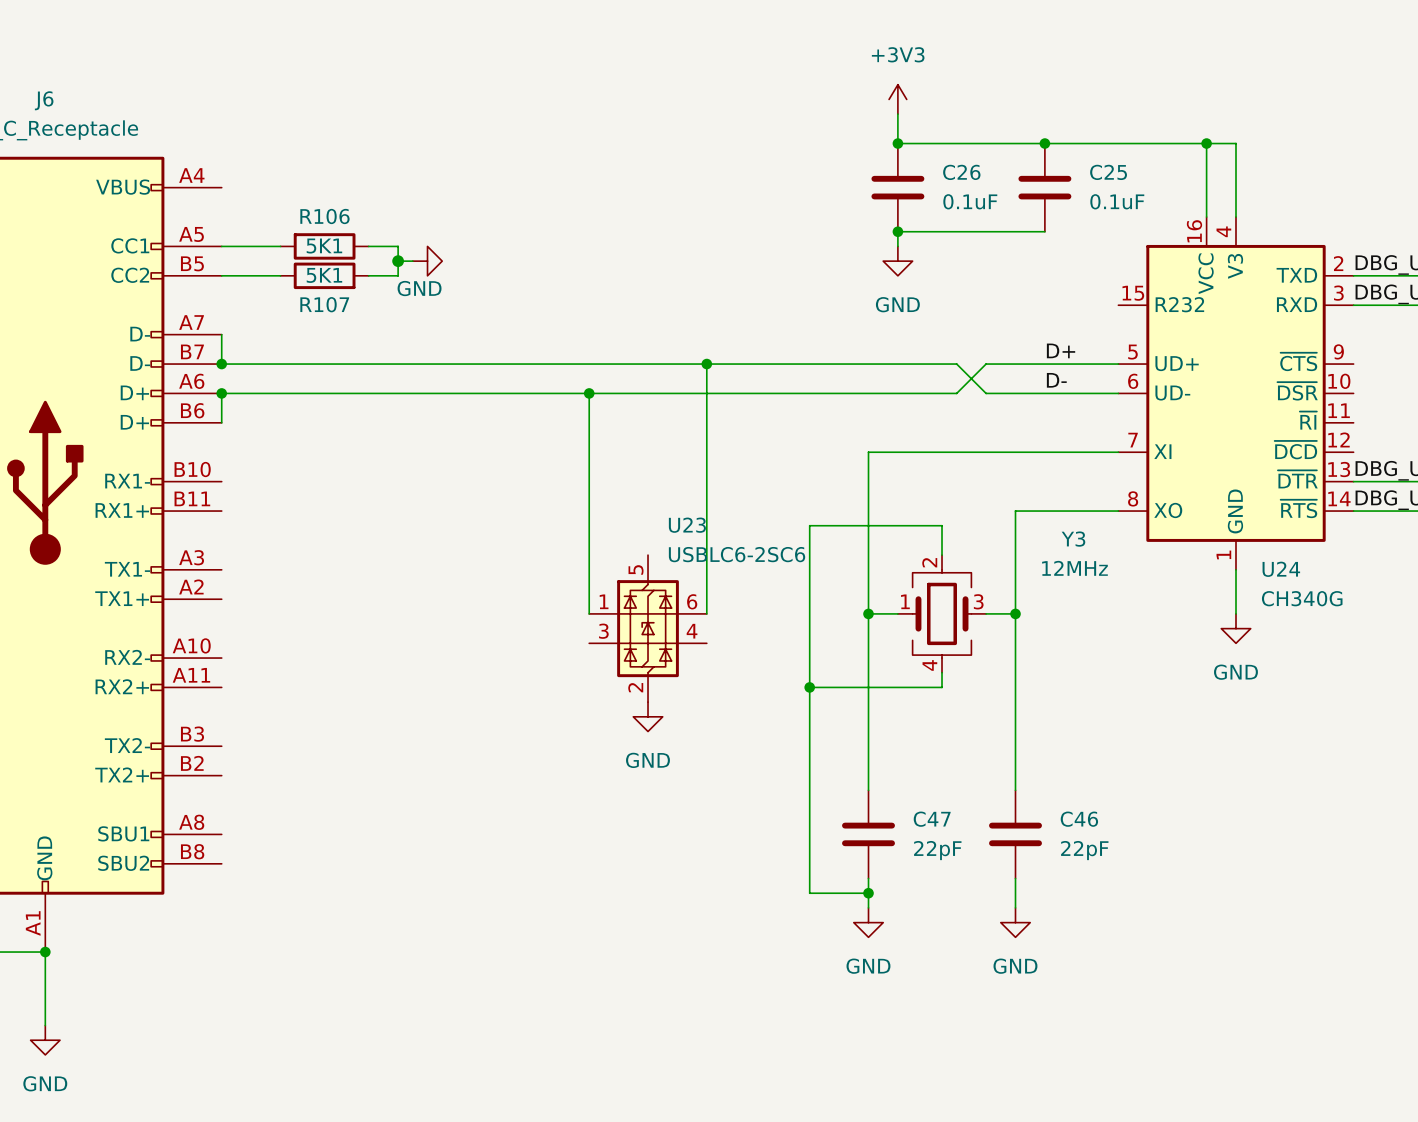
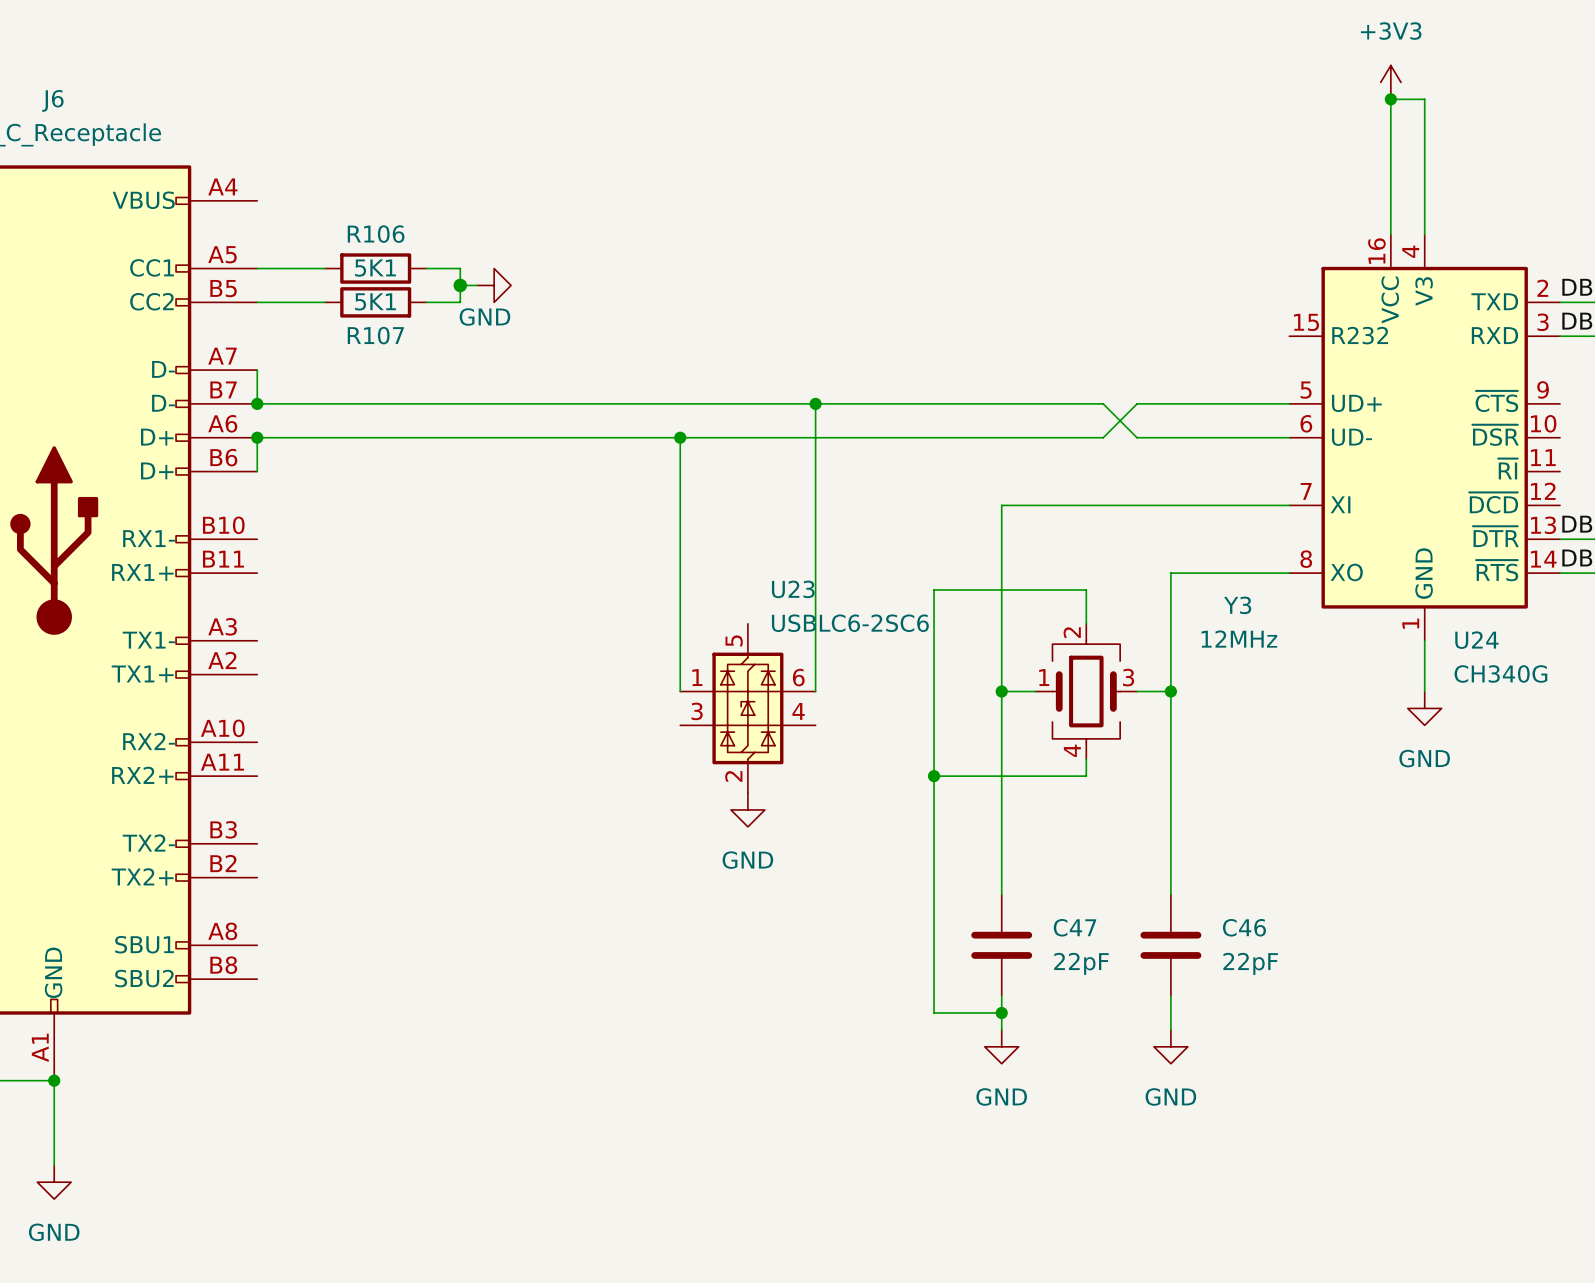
power symbol: none -> +3V3 (1390, 82)
power symbol: +3V3 (897, 99) -> none
wire: (897, 114) (897, 143) (1236, 143) -> (1390, 150) (1390, 99) (1424, 99) (1424, 150)
junction: (897, 143) -> none
junction: (1044, 143) -> none
junction position: (1206, 143) -> (1390, 99)
C26: 0.1uF (897, 187) -> none
C25: 0.1uF (1044, 187) -> none
junction: (897, 231) -> none
wire: (1044, 231) (897, 231) (897, 246) -> none
power symbol: GND (897, 261) -> none
label: D+ (1061, 350) -> none
label: D- (1056, 380) -> none

